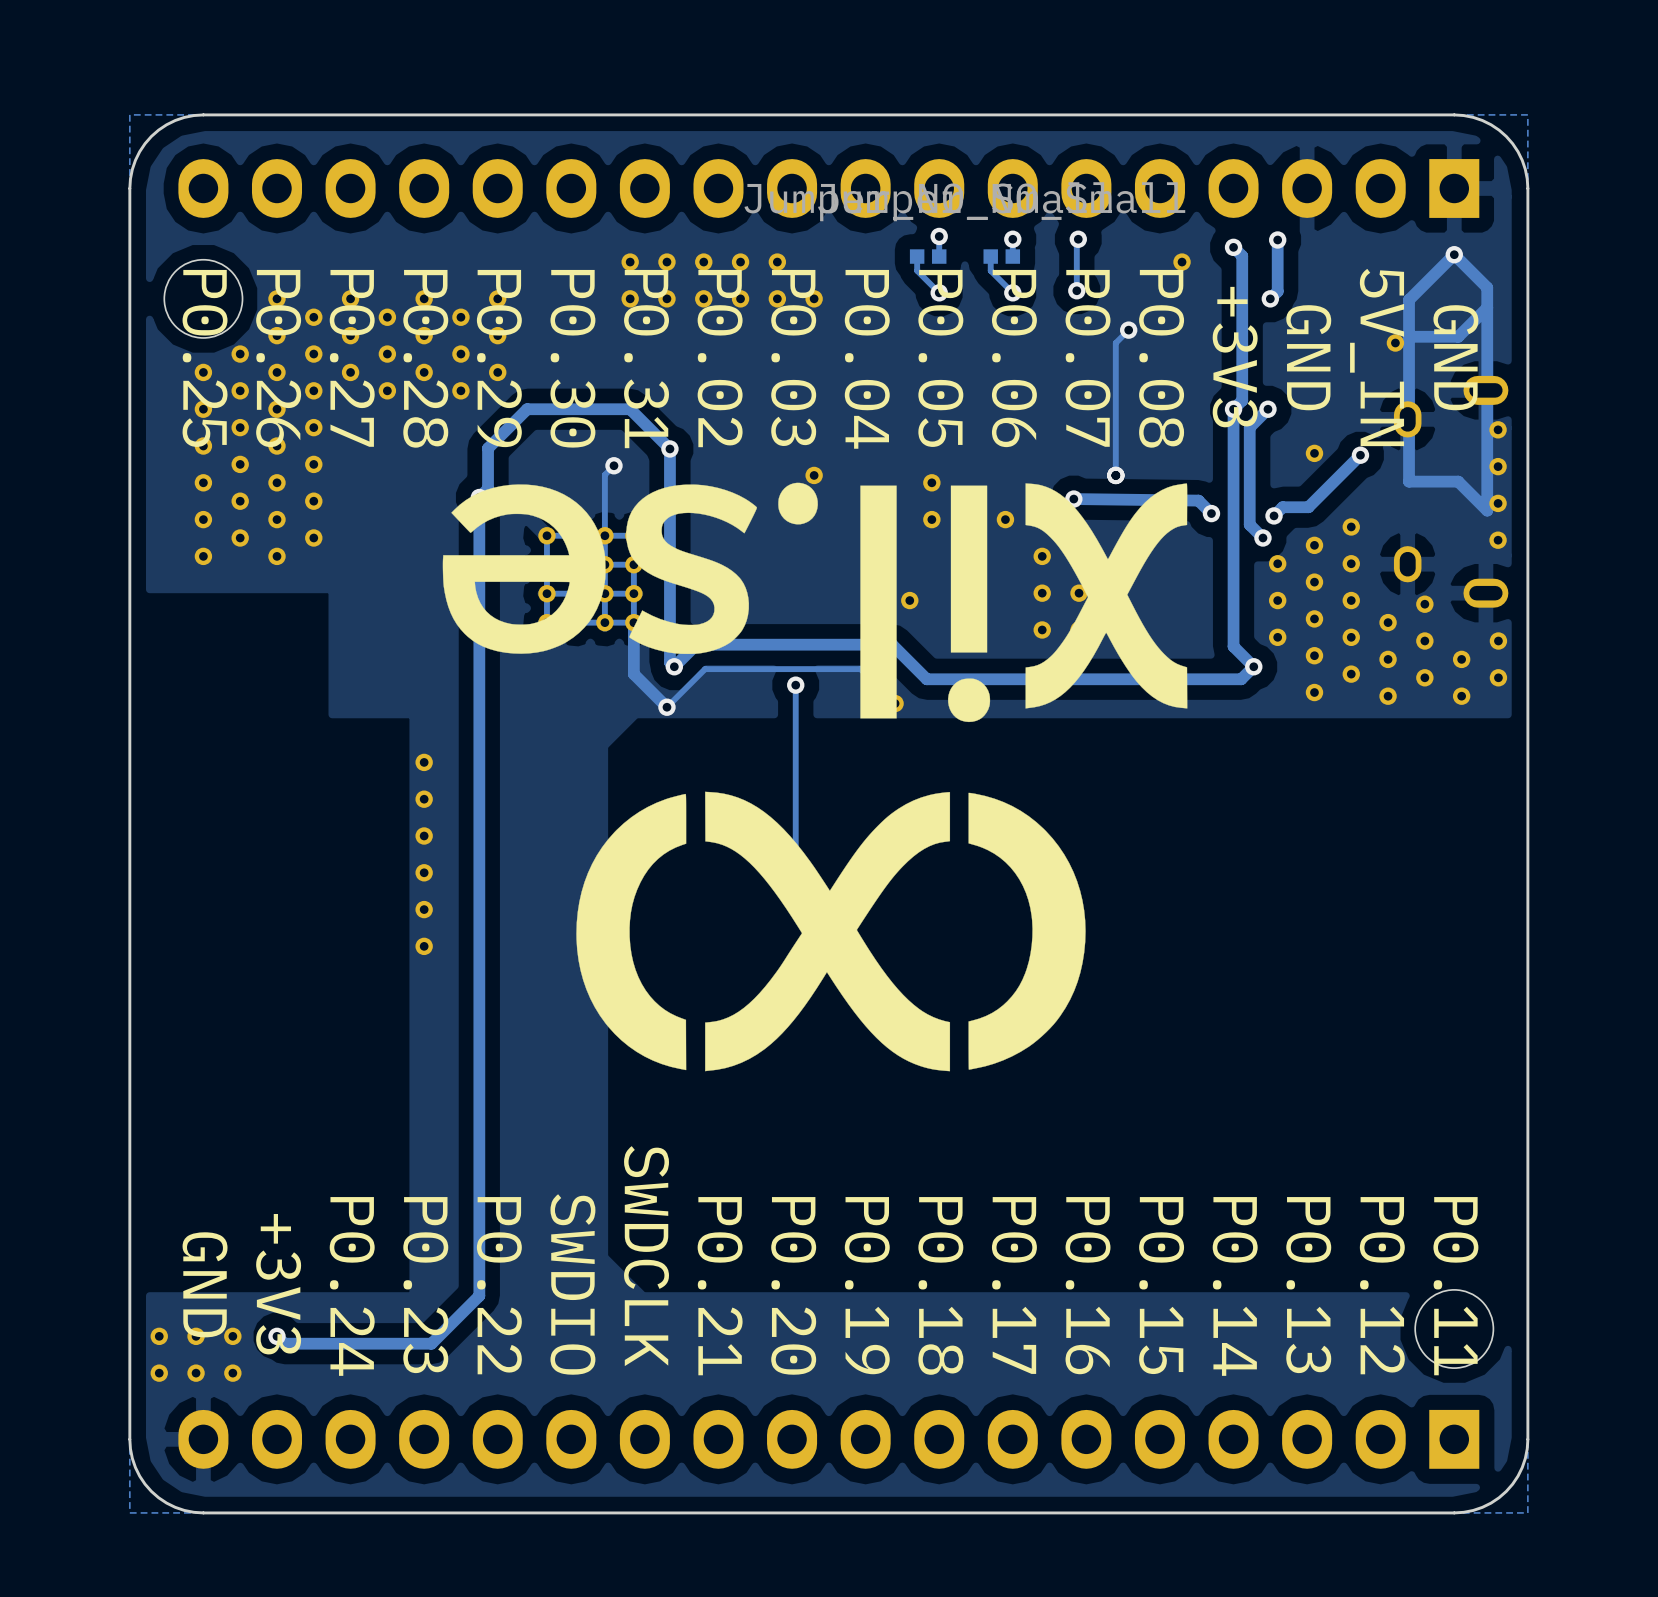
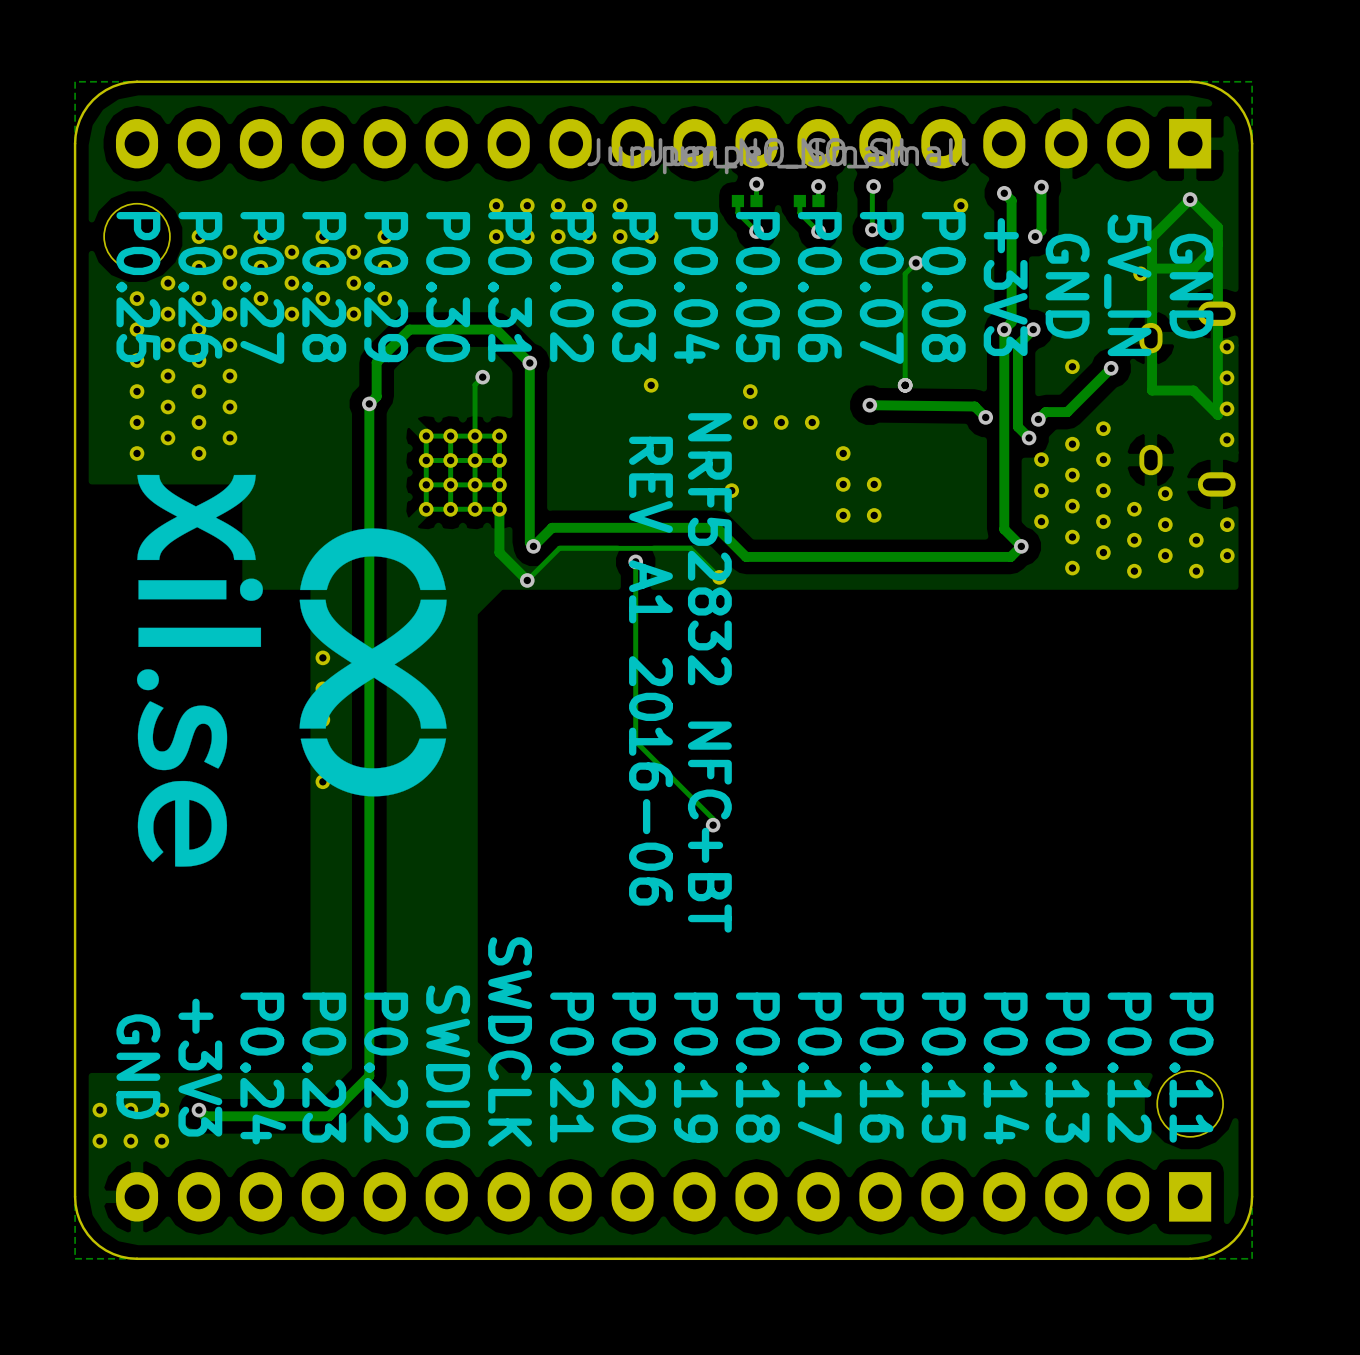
drawing: [442, 482, 1188, 1072] -> none
drawing: none -> [136, 474, 447, 867]
text: none -> REV A1 2016-06 (650, 671)
text: none -> NRF52832 NFC+BT (709, 672)

